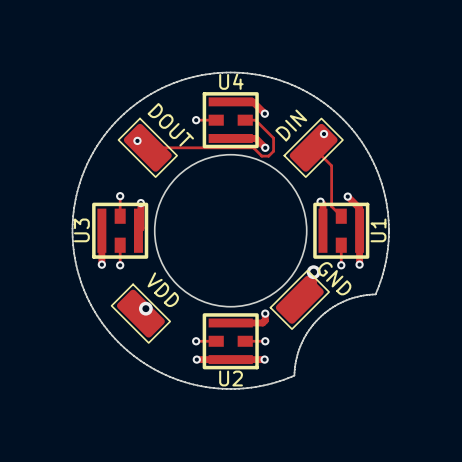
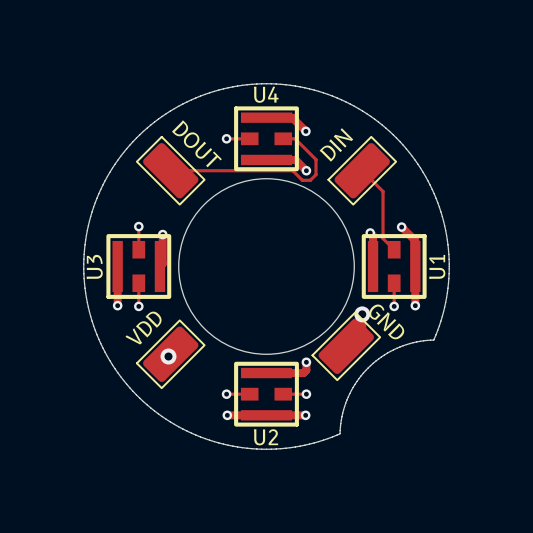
via: (324, 134) -> none
via: (137, 140) -> none
VDD name position: VDD (163, 289) -> VDD (143, 328)
VDD rotation: 0° (140, 313) -> 90° clockwise (170, 354)

